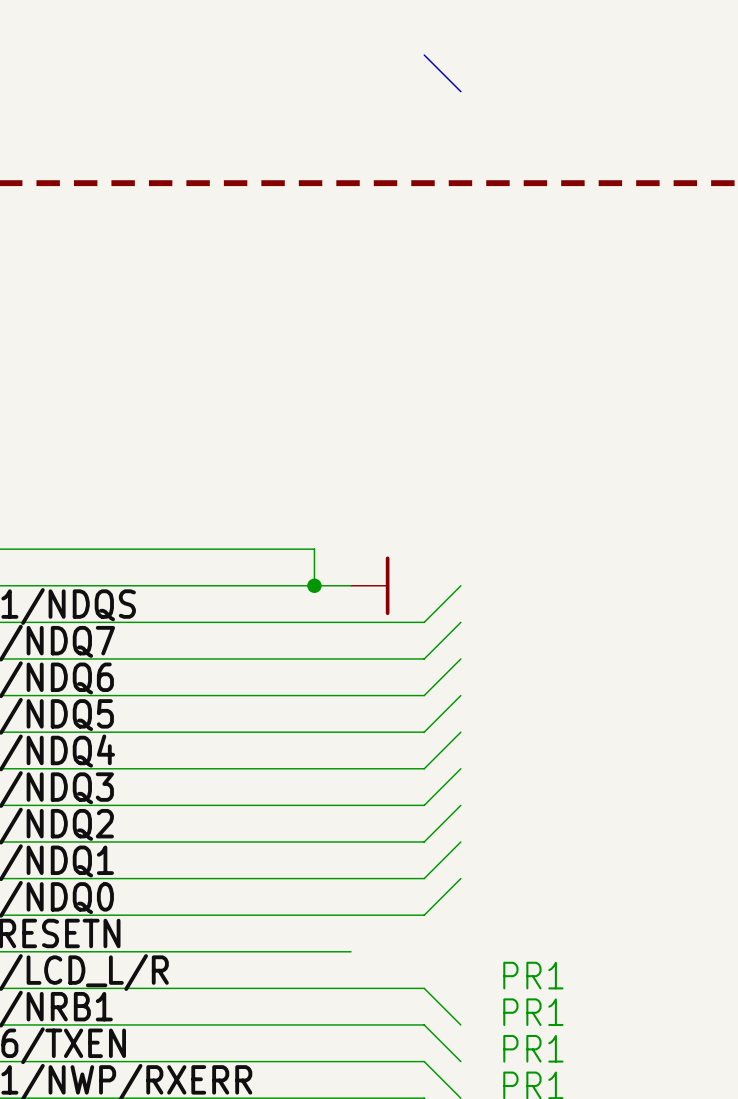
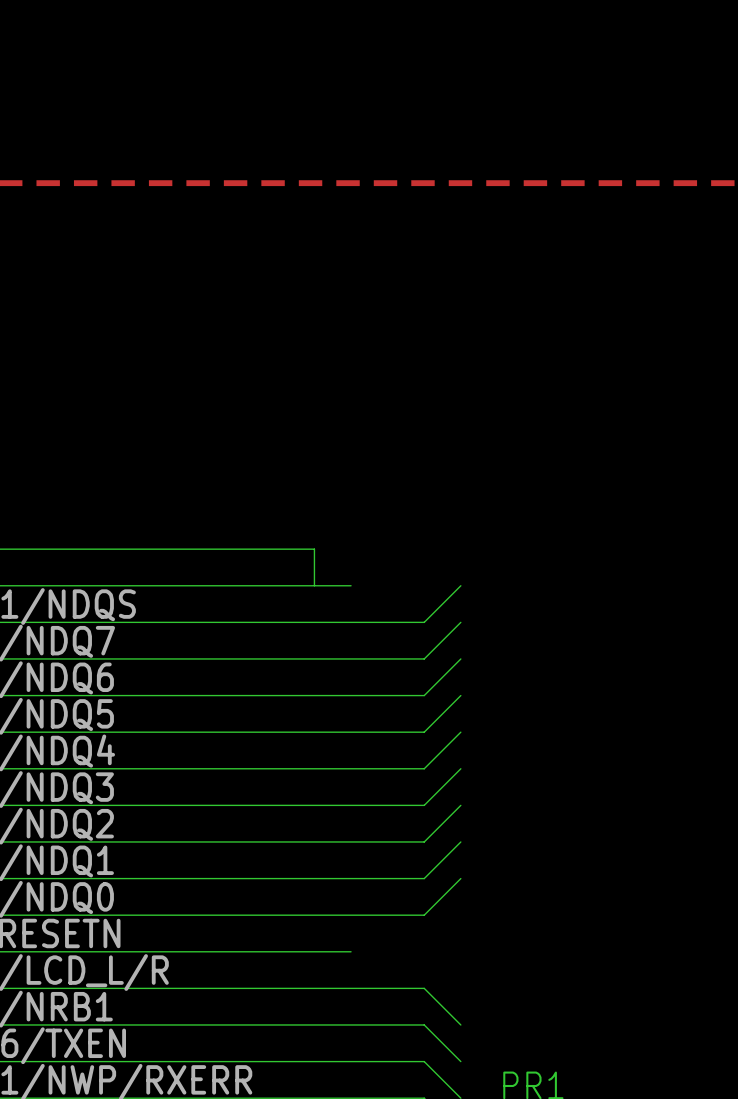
bus: (424, 55) (460, 91) -> none
junction: (314, 585) -> none
power symbol: (370, 585) -> none
text: PR1 (533, 975) -> none
text: PR1 (533, 1012) -> none
text: PR1 (533, 1048) -> none

